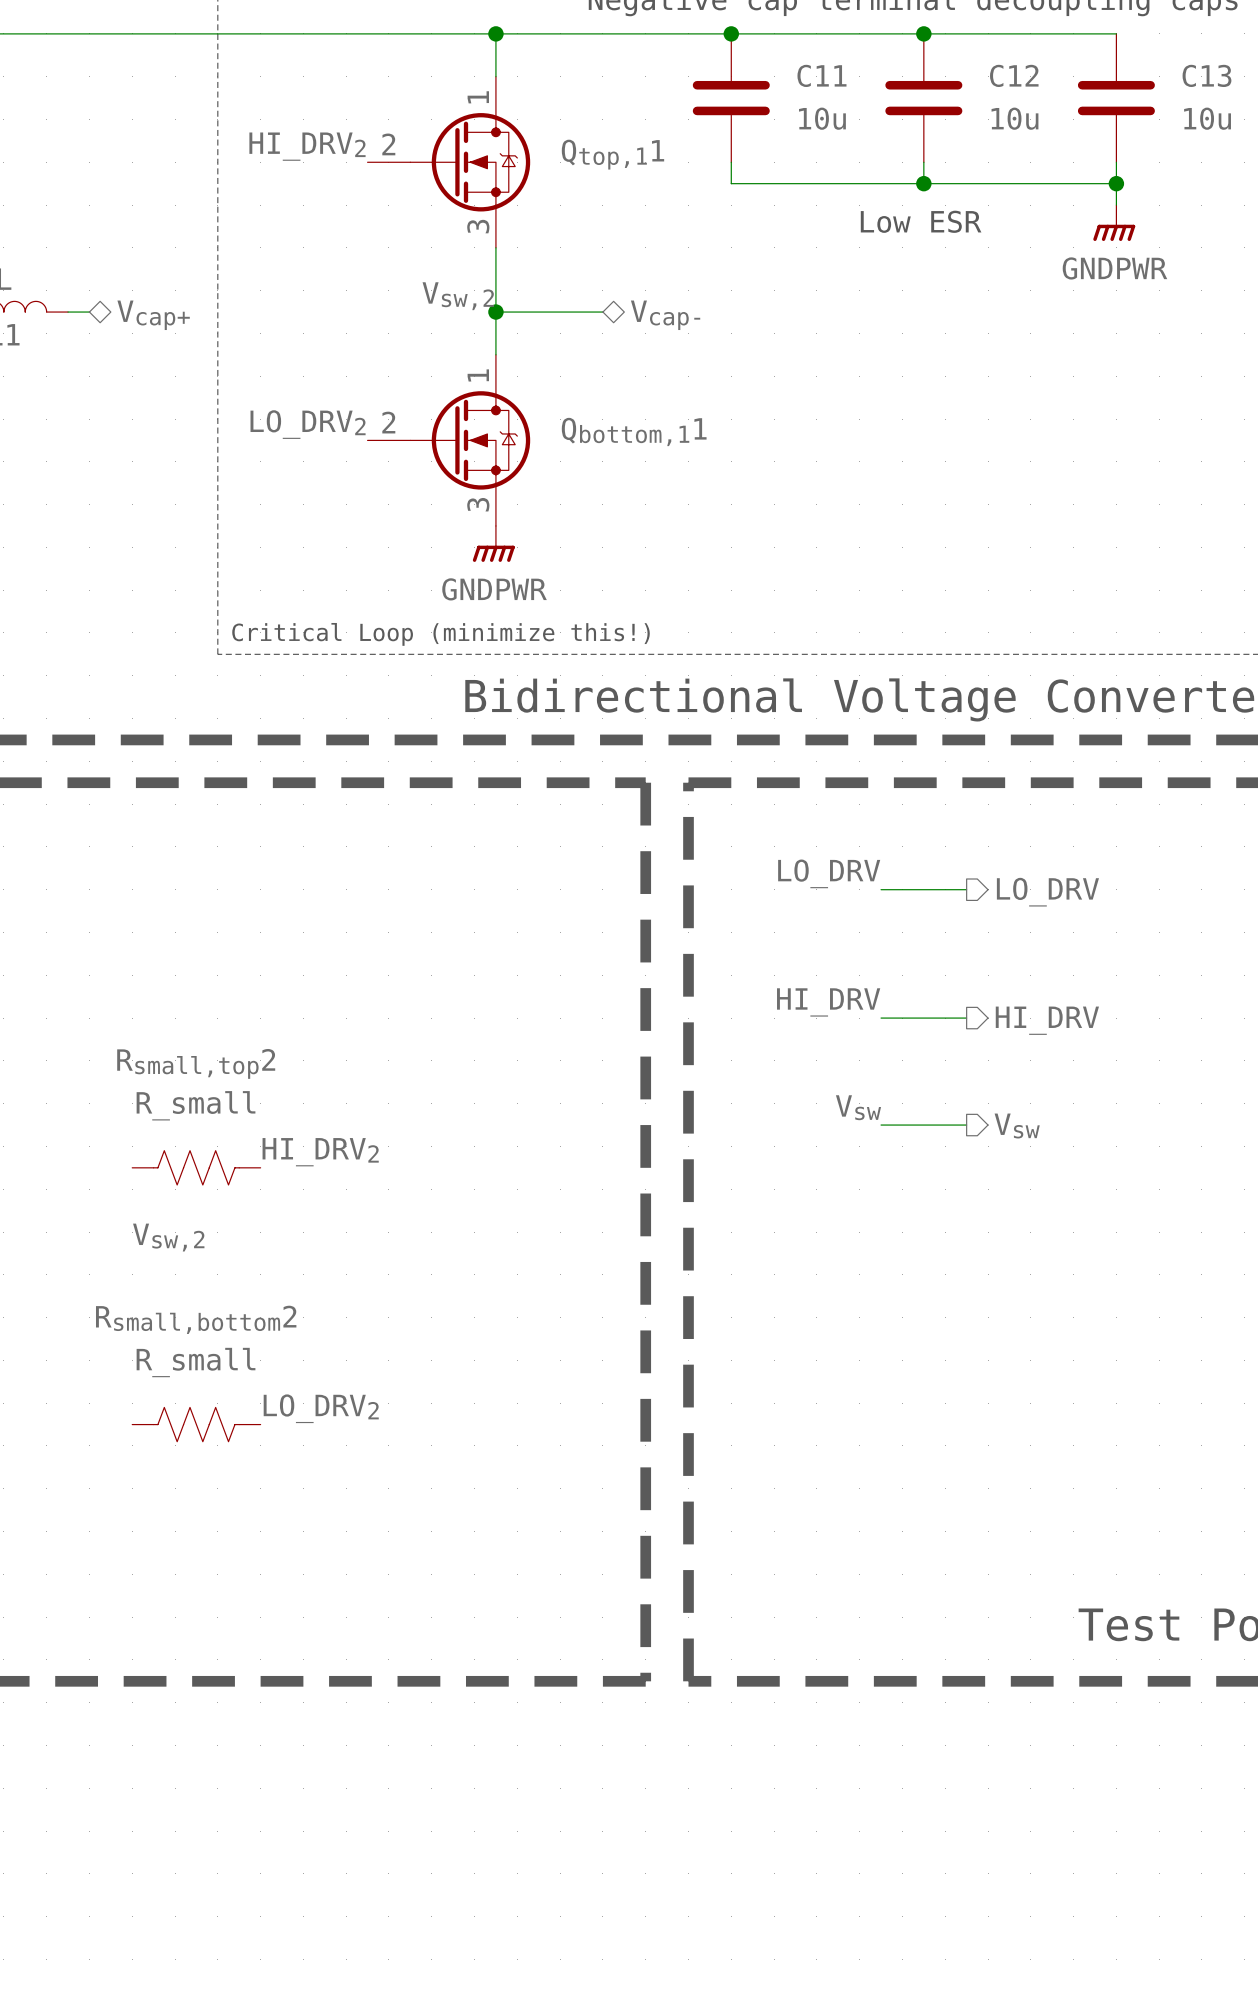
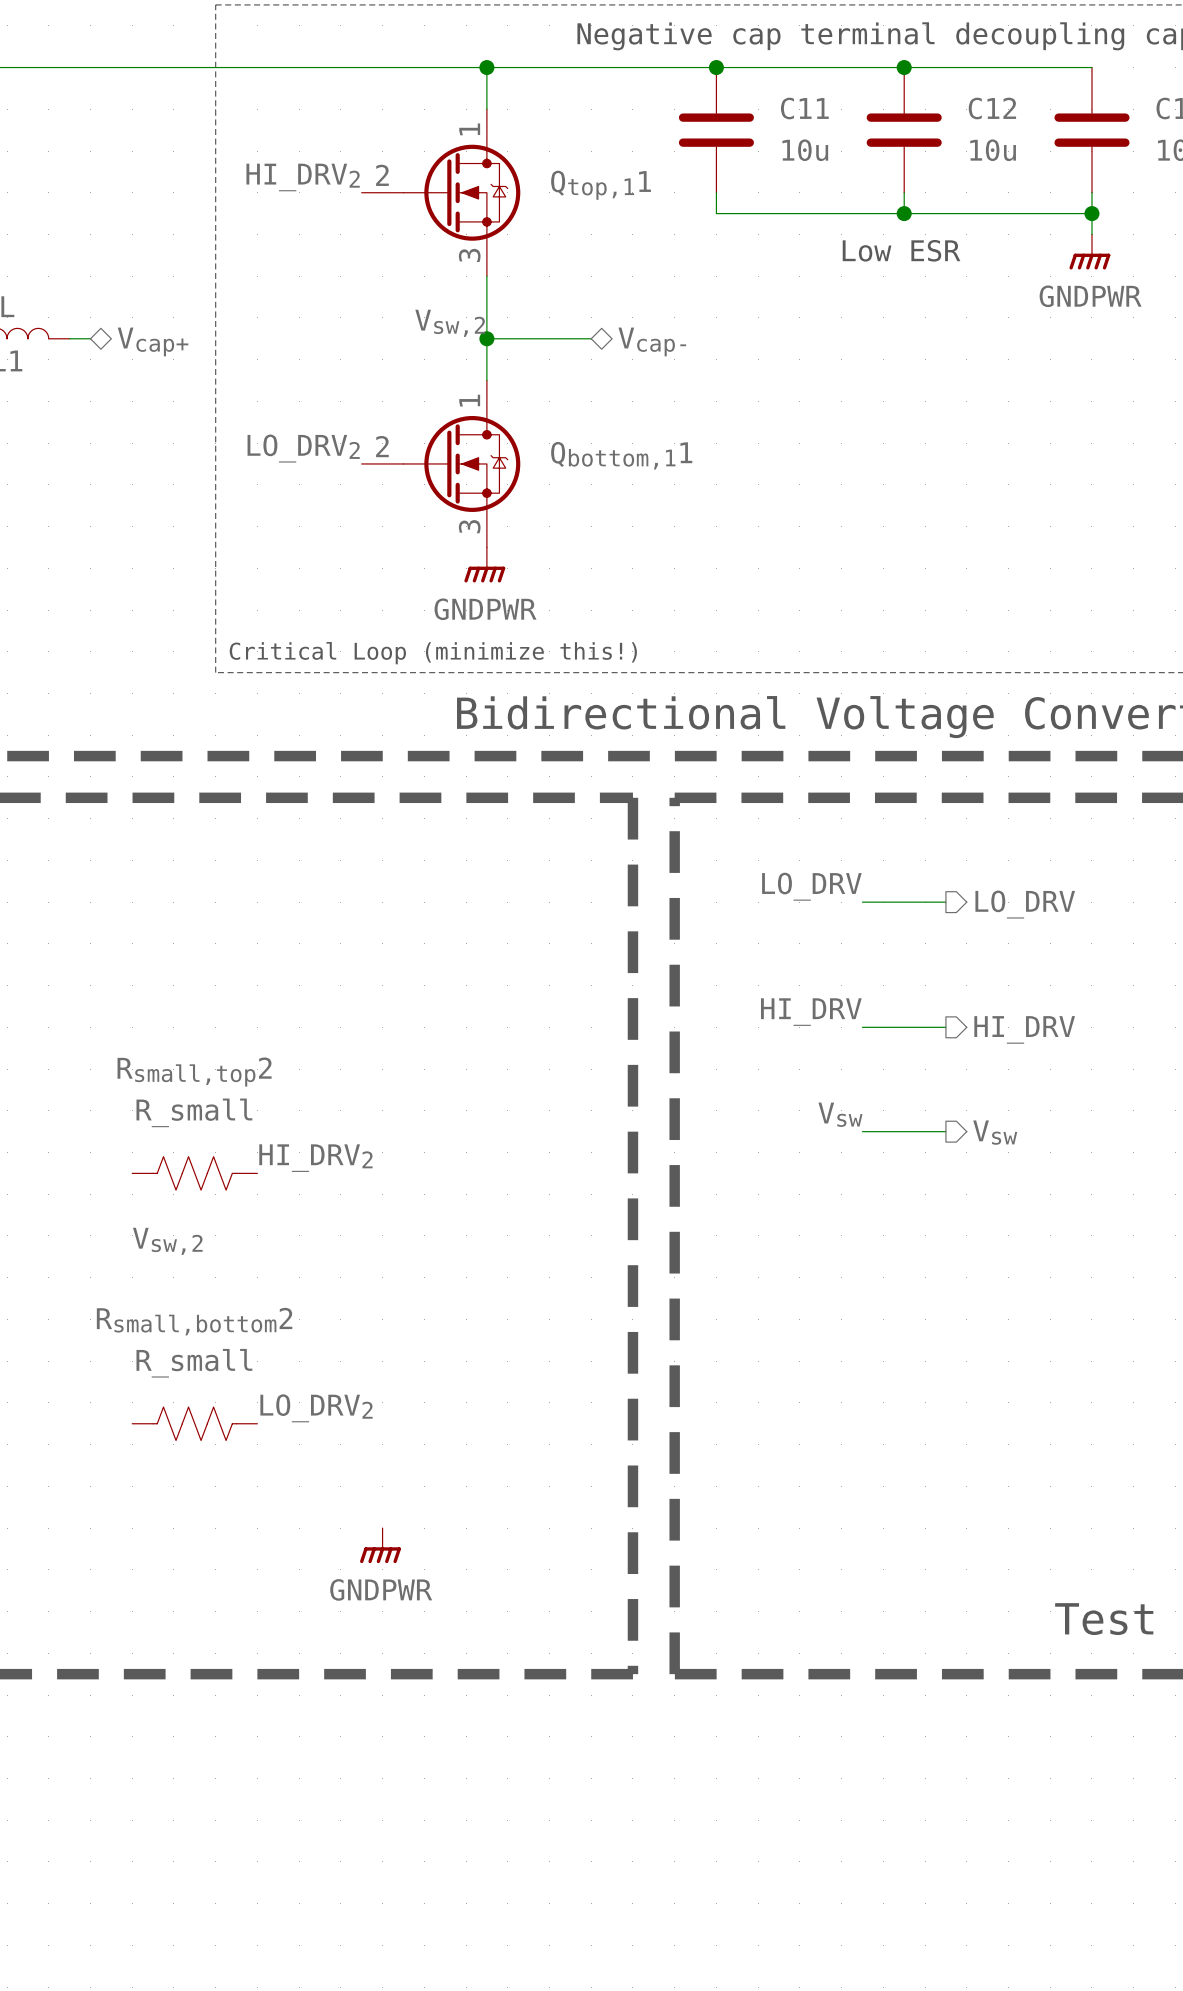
power symbol: none -> GNDPWR (380, 1545)

